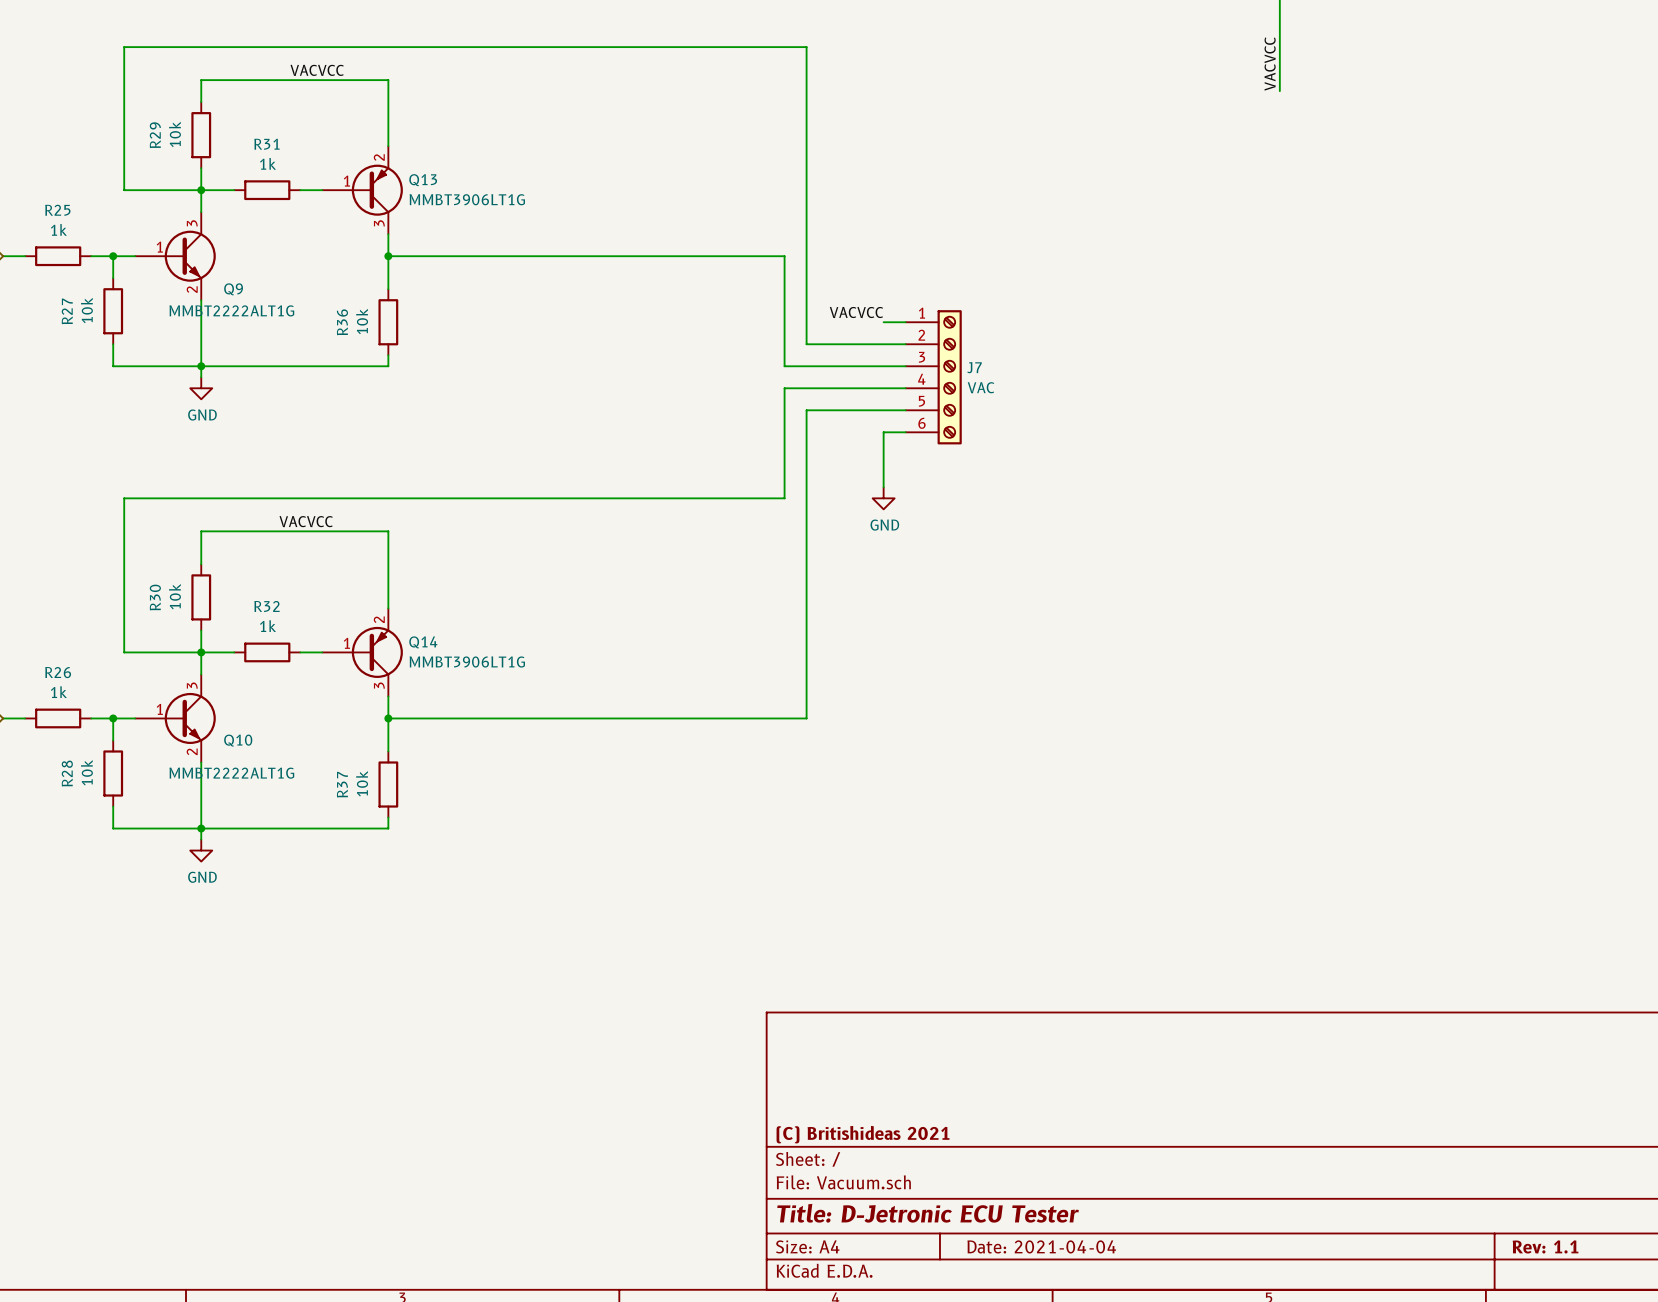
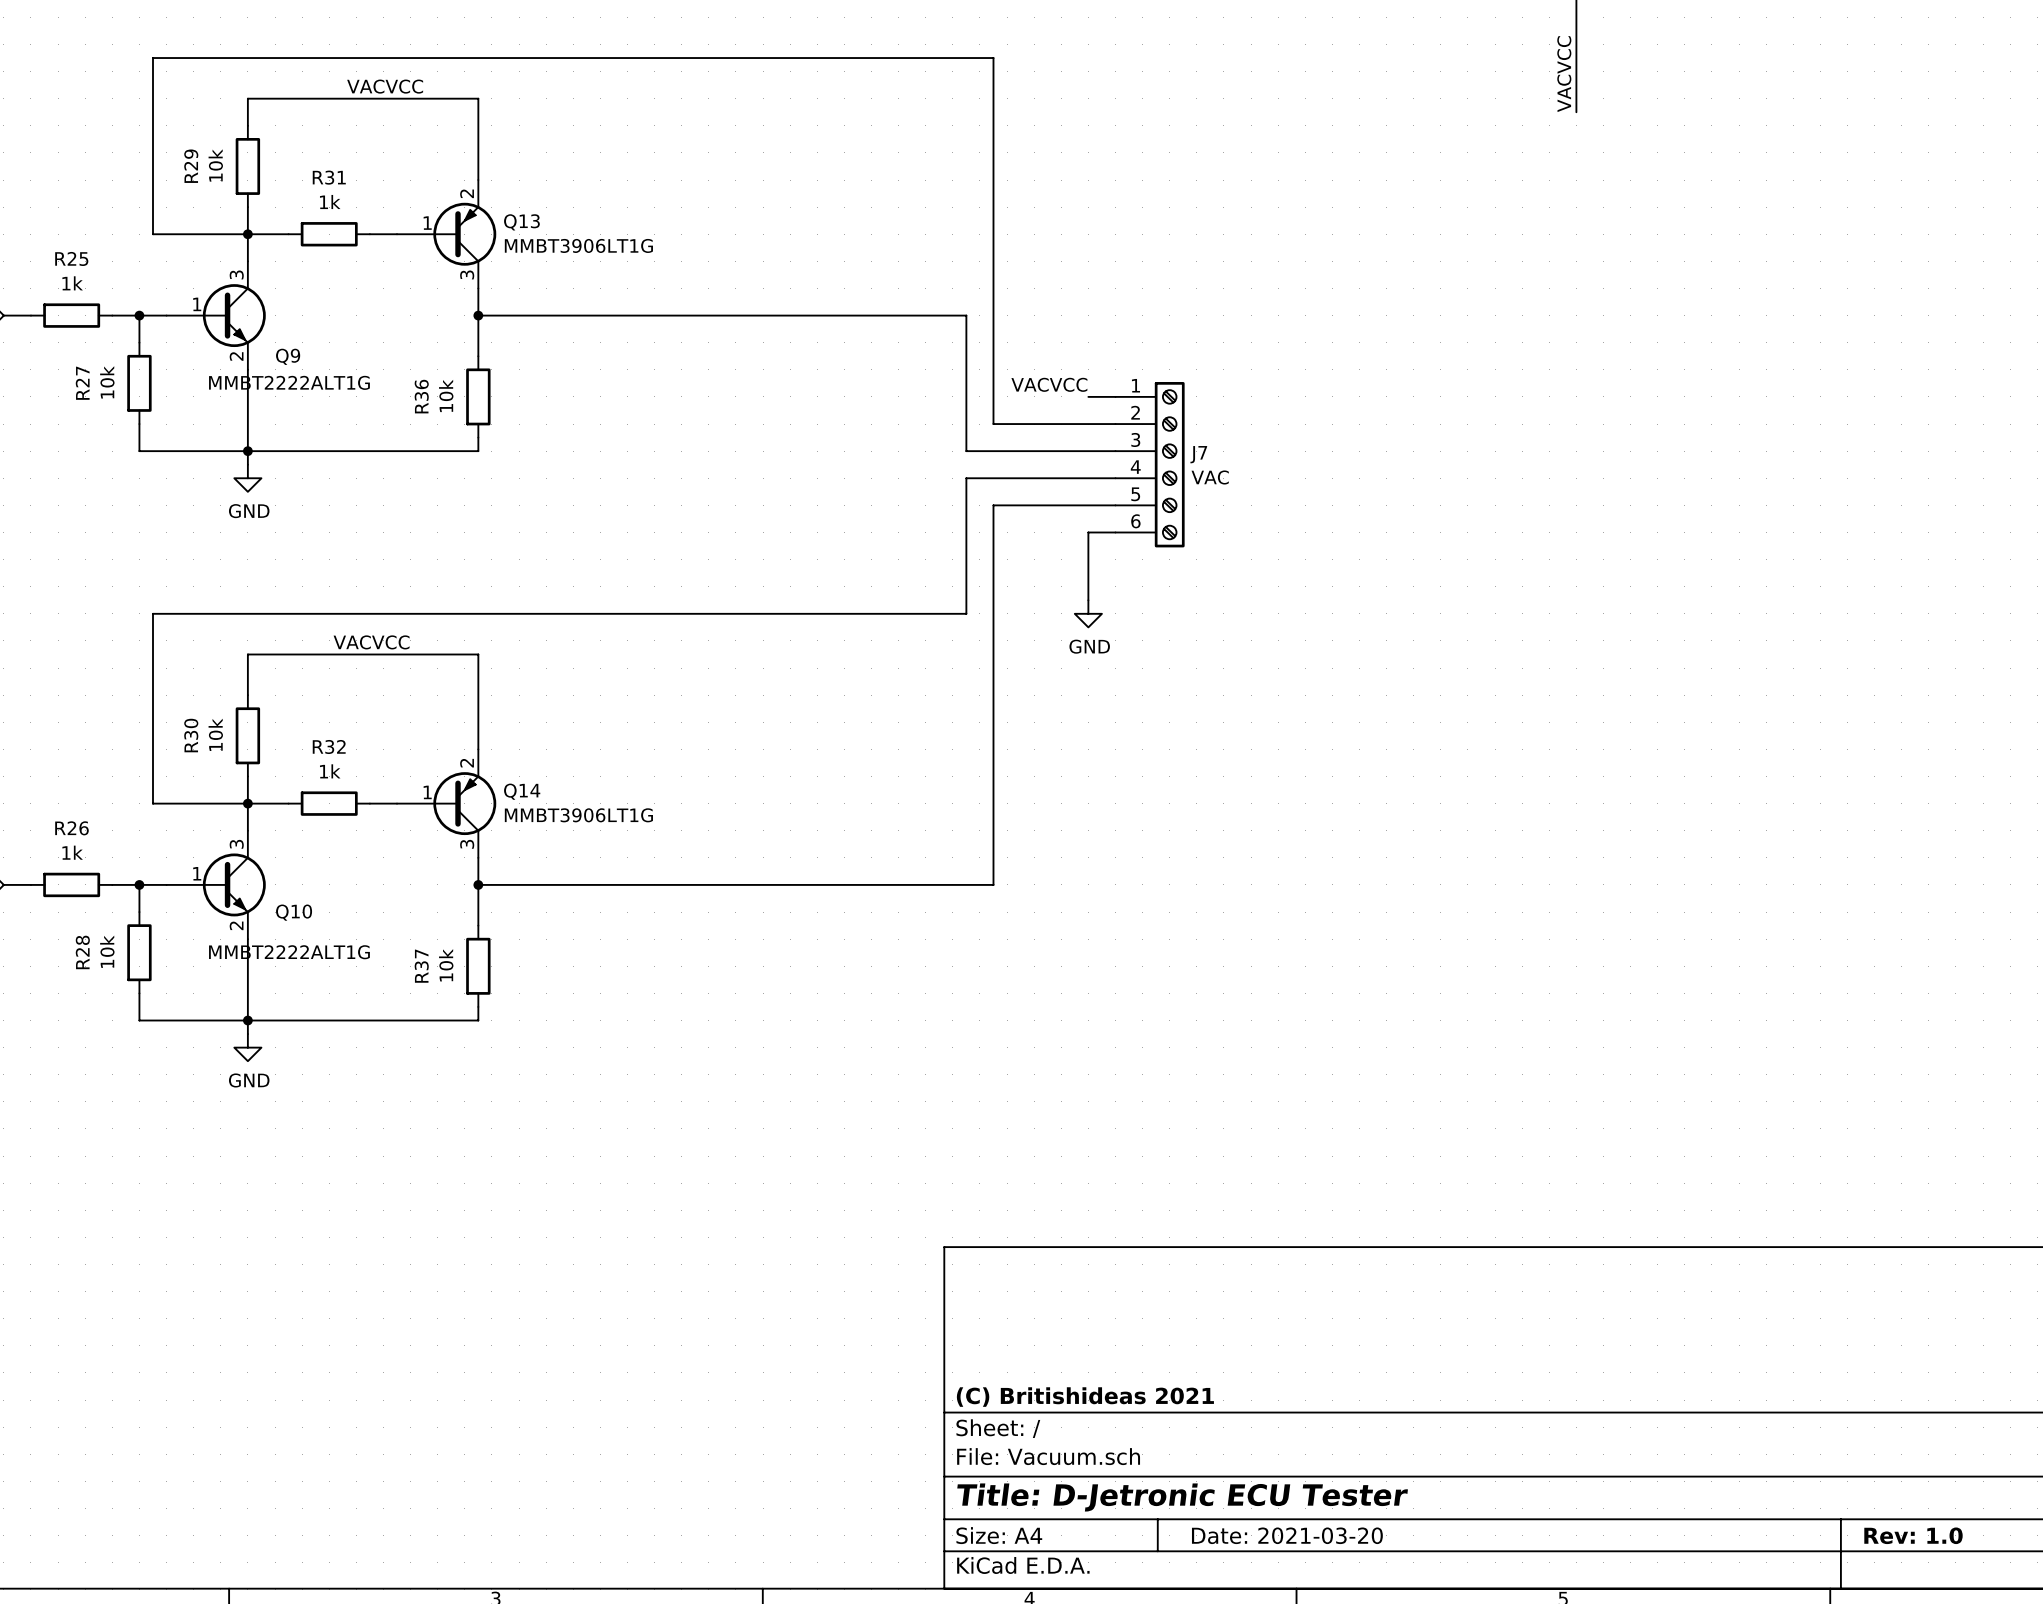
title block: Date: 2021-04-04 (1041, 1246) -> Date: 2021-03-20 (1287, 1535)
title block: Rev: 1.1 (1545, 1246) -> Rev: 1.0 (1913, 1535)

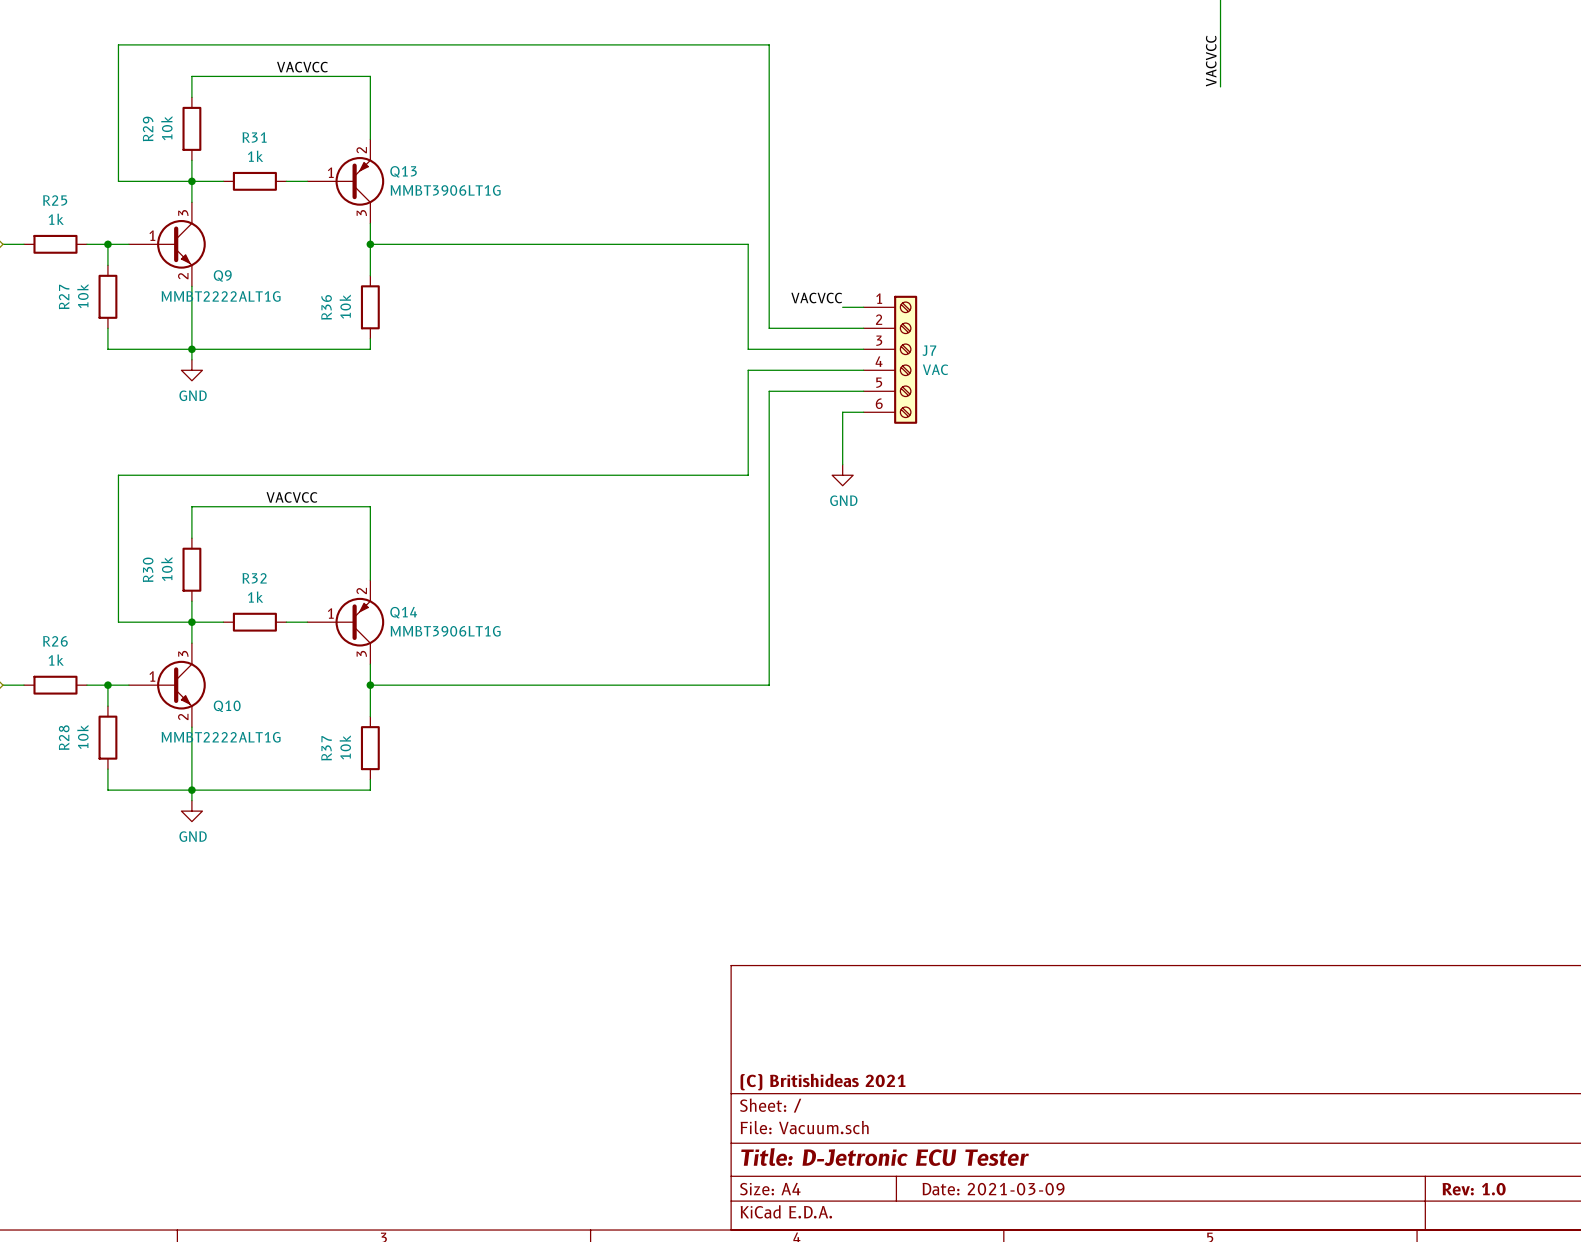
title block: Date: 2021-03-20 (1287, 1535) -> Date: 2021-03-09 (993, 1189)

